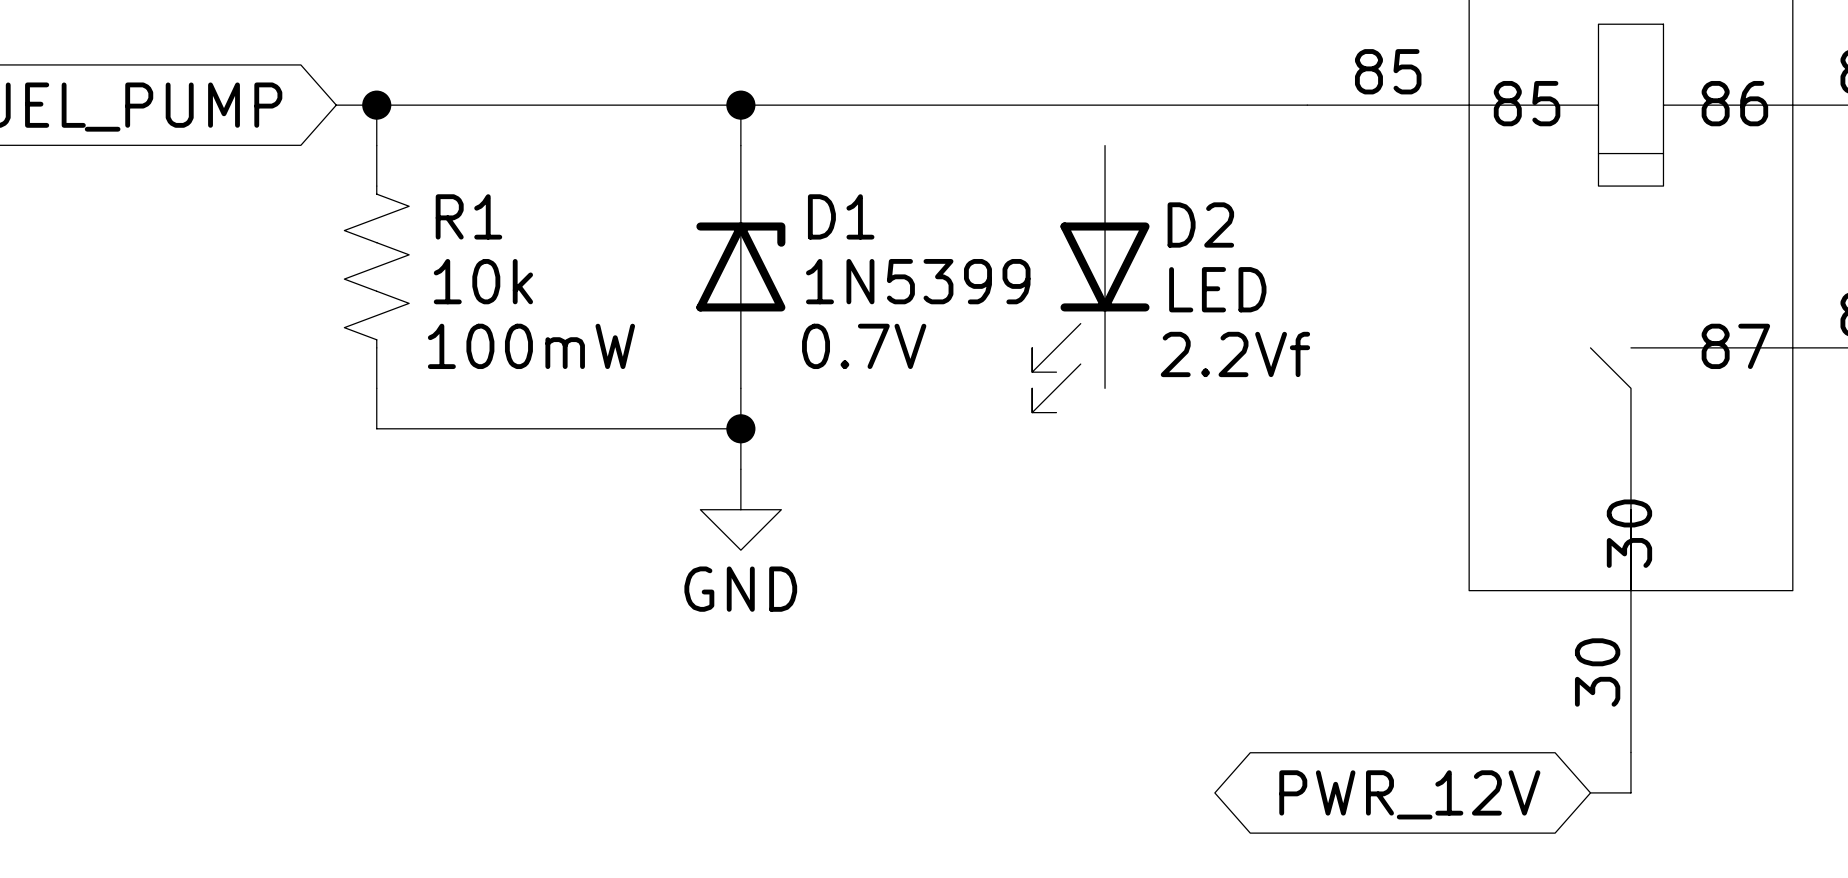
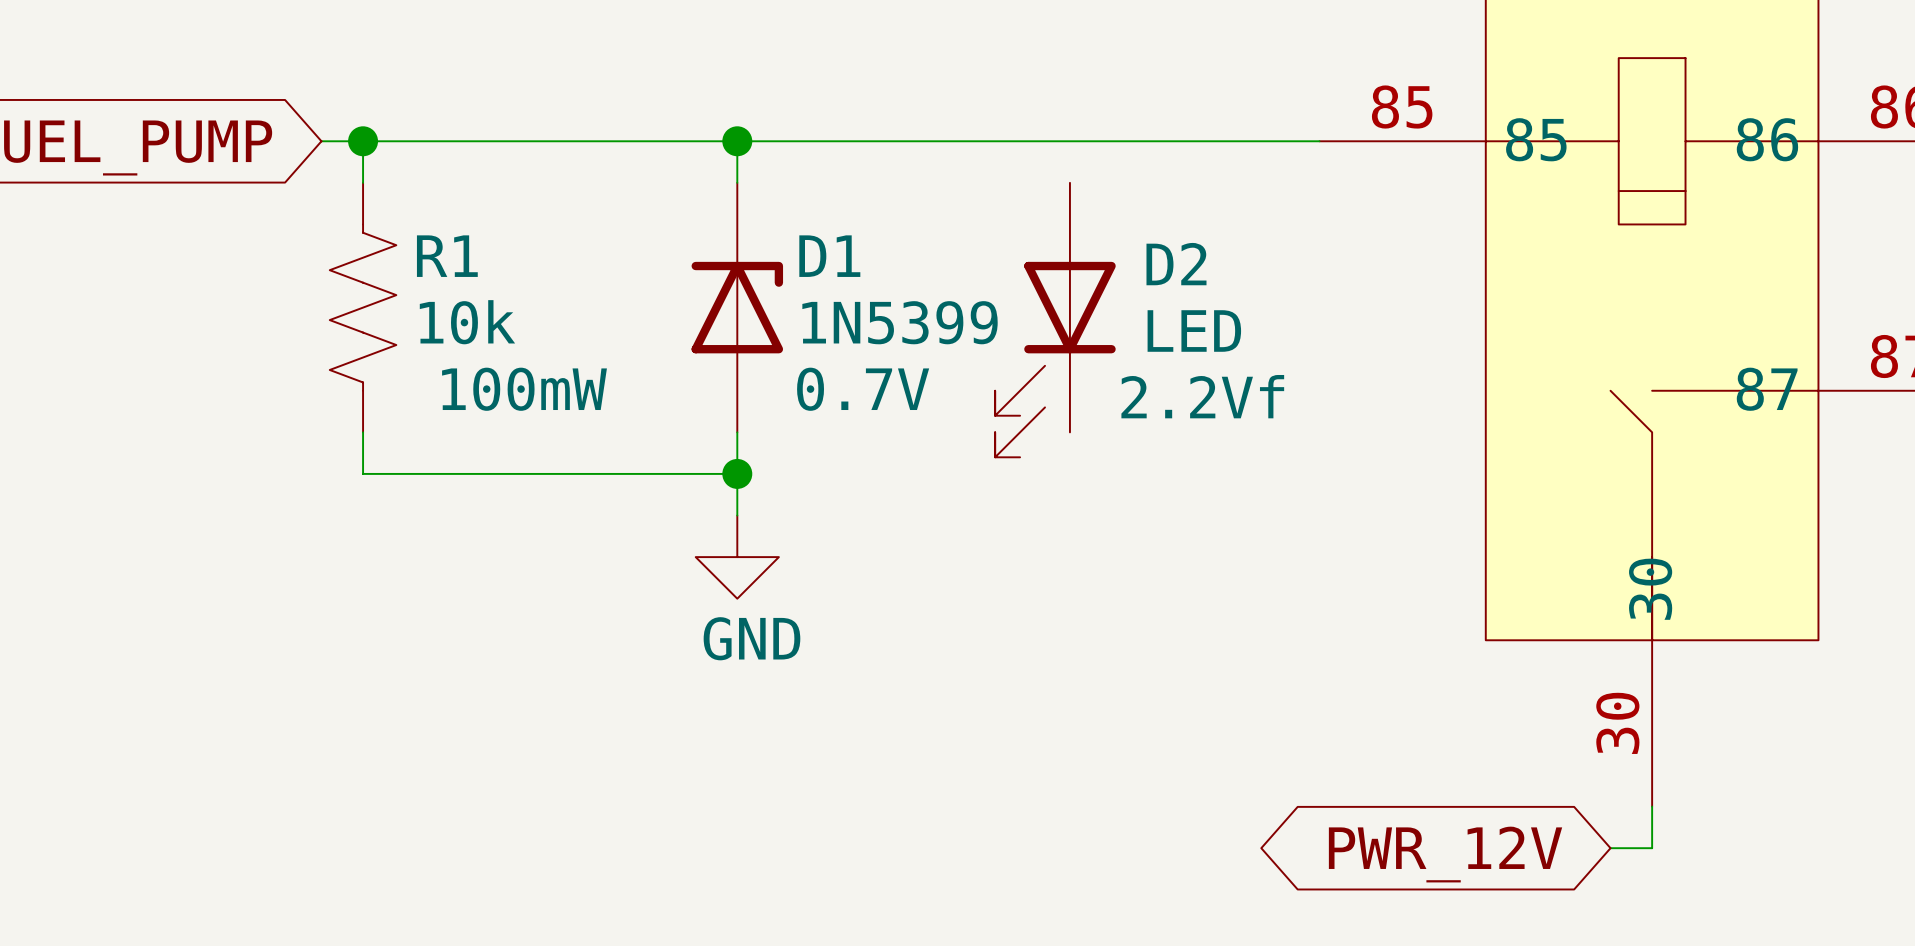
D2 position: (1090, 279) -> (1055, 320)

